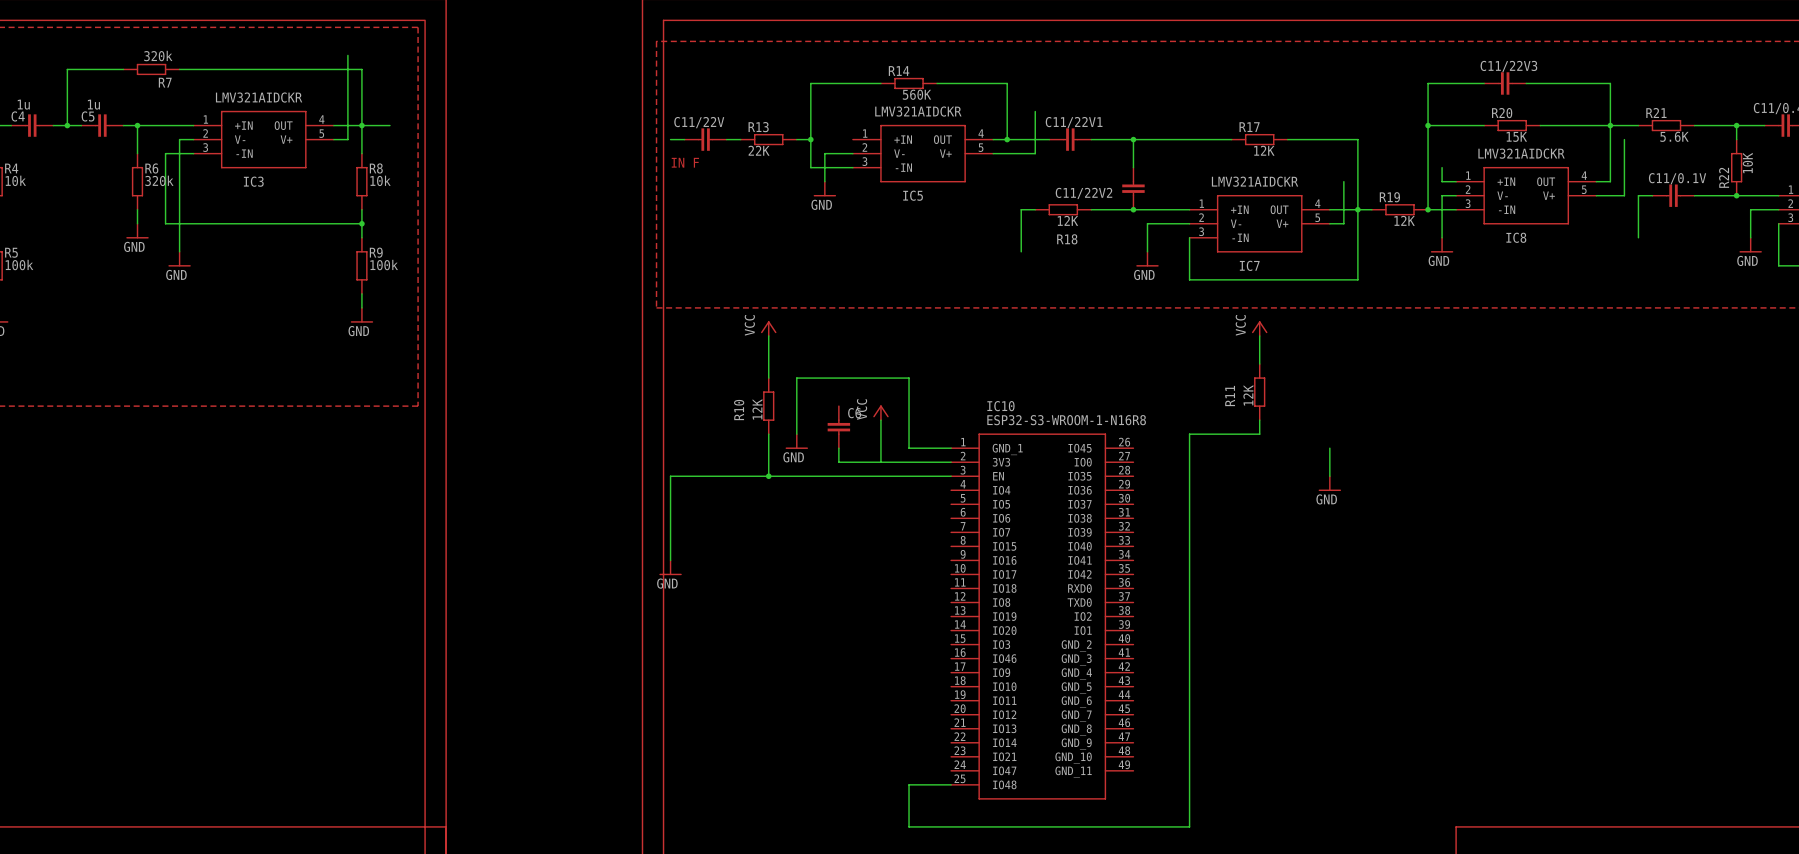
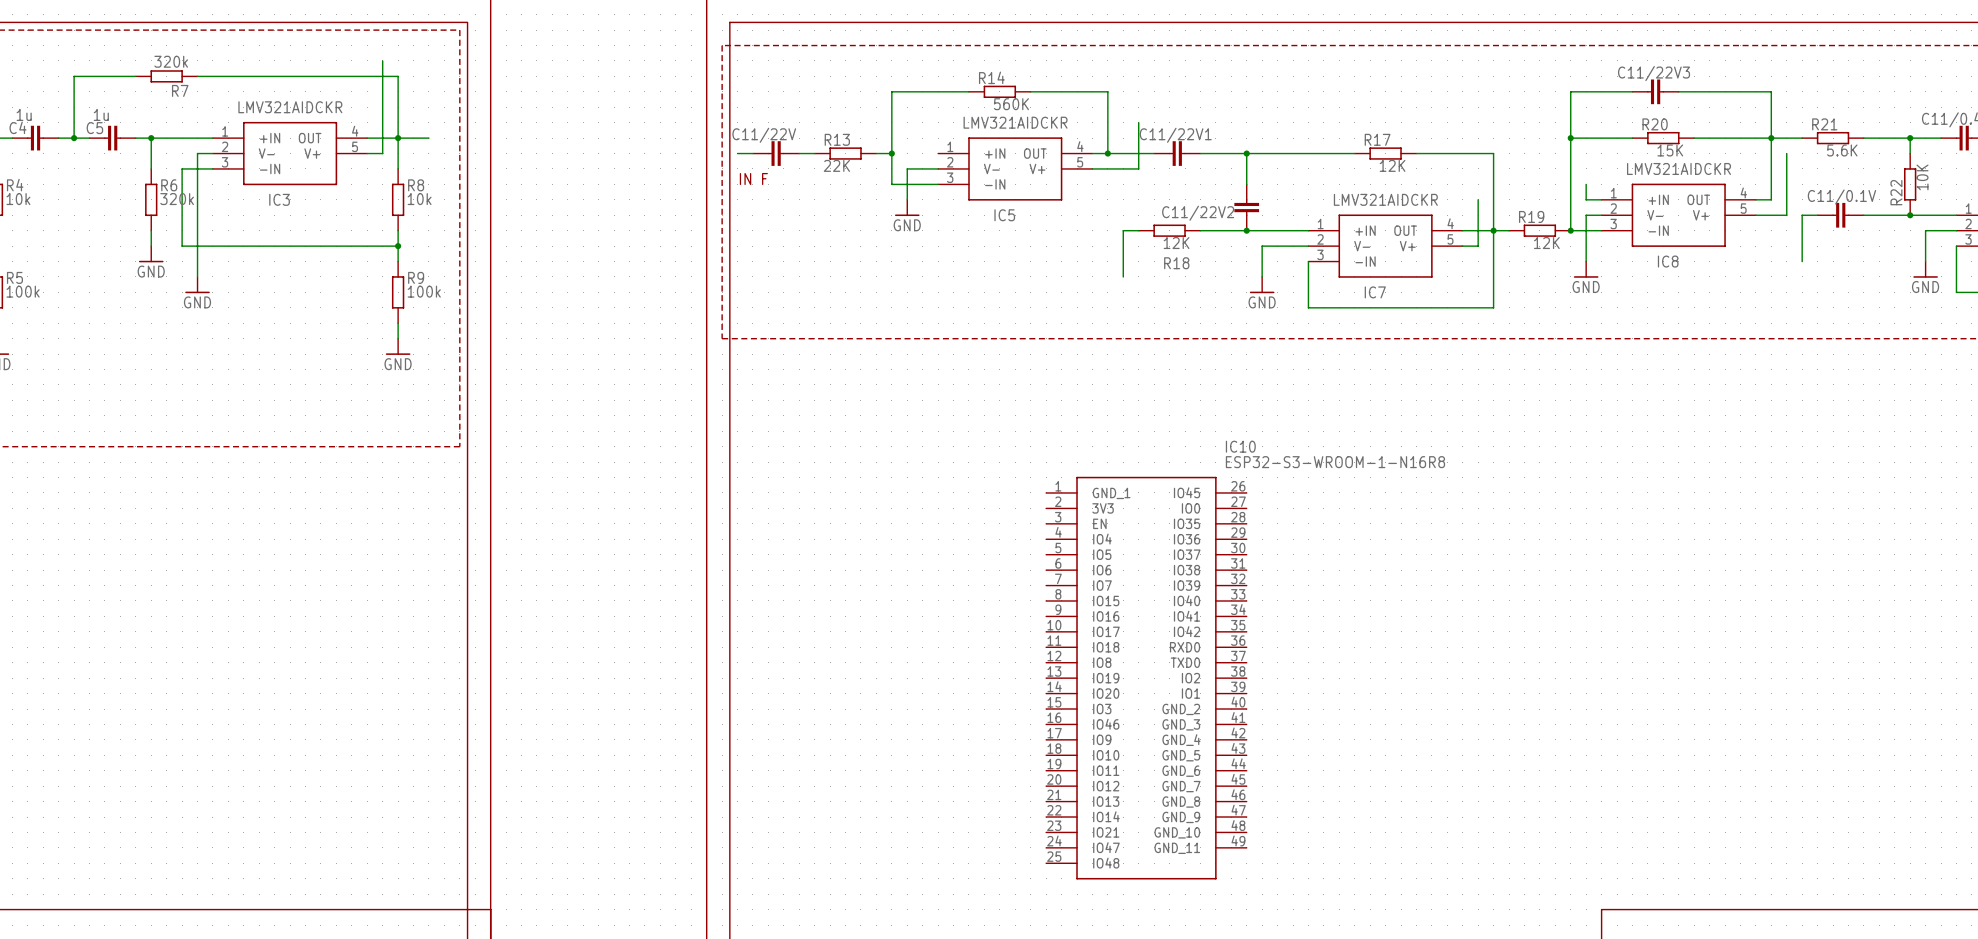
power symbol: VCC (768, 328) -> none
power symbol: VCC (1259, 328) -> none
wire: (768, 335) (768, 378) -> none
wire: (1259, 335) (1259, 364) -> none
R11: 12K (1259, 392) -> none
R10: 12K (768, 406) -> none
IC10 name position: IC10 (1000, 406) -> IC10 (1240, 446)
power symbol: VCC (880, 412) -> none
wire: (880, 420) (880, 462) -> none
IC10 value position: ESP32-S3-WROOM-1-N16R8 (1066, 420) -> ESP32-S3-WROOM-1-N16R8 (1335, 462)
wire: (1259, 420) (1259, 434) (1189, 434) (1189, 826) (909, 826) (909, 784) (951, 784) -> none
C6: (838, 427) -> none
wire: (768, 434) (768, 476) -> none
wire: (796, 434) (796, 378) (909, 378) (909, 448) (951, 448) -> none
power symbol: GND (796, 441) -> none
wire: (838, 448) (838, 462) (951, 462) -> none
wire: (1329, 448) (1329, 476) -> none
junction: (768, 476) -> none
wire: (951, 476) (670, 476) (670, 560) -> none
power symbol: GND (1329, 483) -> none
power symbol: GND (670, 567) -> none

